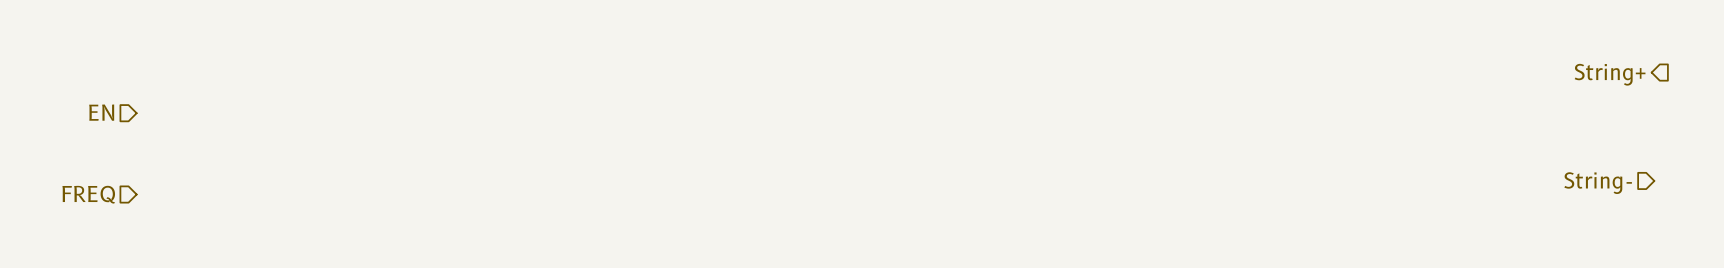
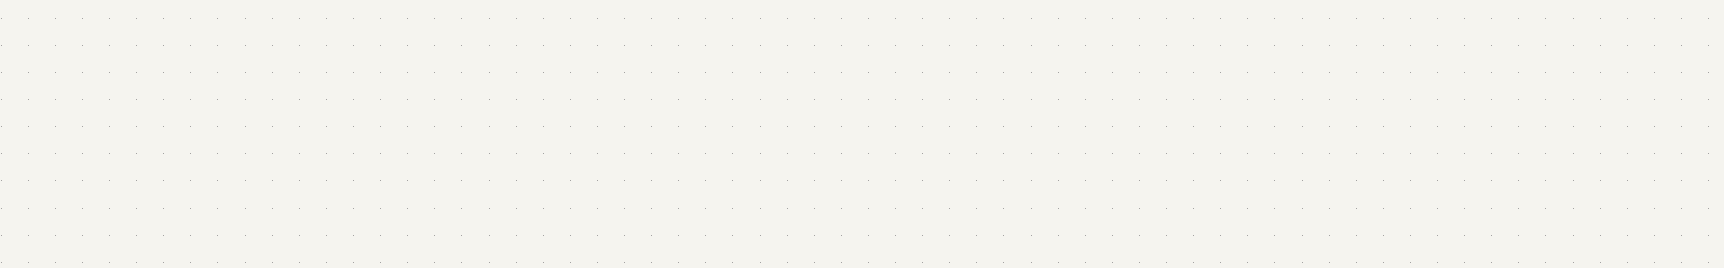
hierarchical label: String+ (1610, 74) -> none
hierarchical label: EN (101, 112) -> none
hierarchical label: String- (1598, 183) -> none
hierarchical label: FREQ (88, 194) -> none

